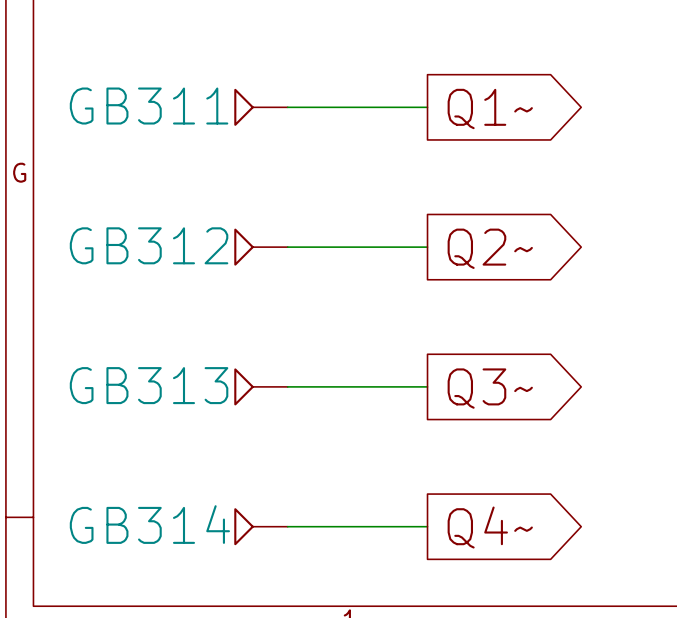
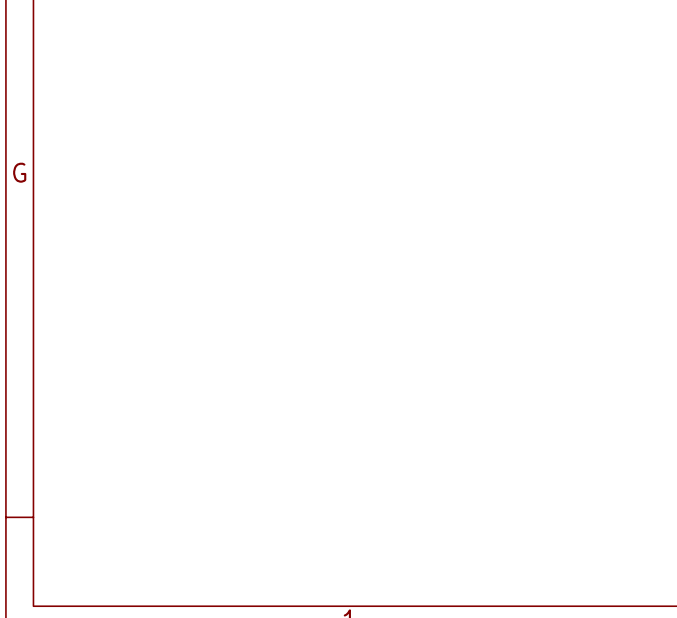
GB311: (260, 107) -> none
wire: (287, 107) (427, 107) -> none
global label: Q1~ (490, 108) -> none
GB312: (260, 247) -> none
wire: (287, 247) (427, 247) -> none
global label: Q2~ (490, 248) -> none
GB313: (260, 386) -> none
wire: (287, 386) (427, 386) -> none
global label: Q3~ (490, 388) -> none
GB314: (260, 526) -> none
wire: (287, 526) (427, 526) -> none
global label: Q4~ (490, 527) -> none

